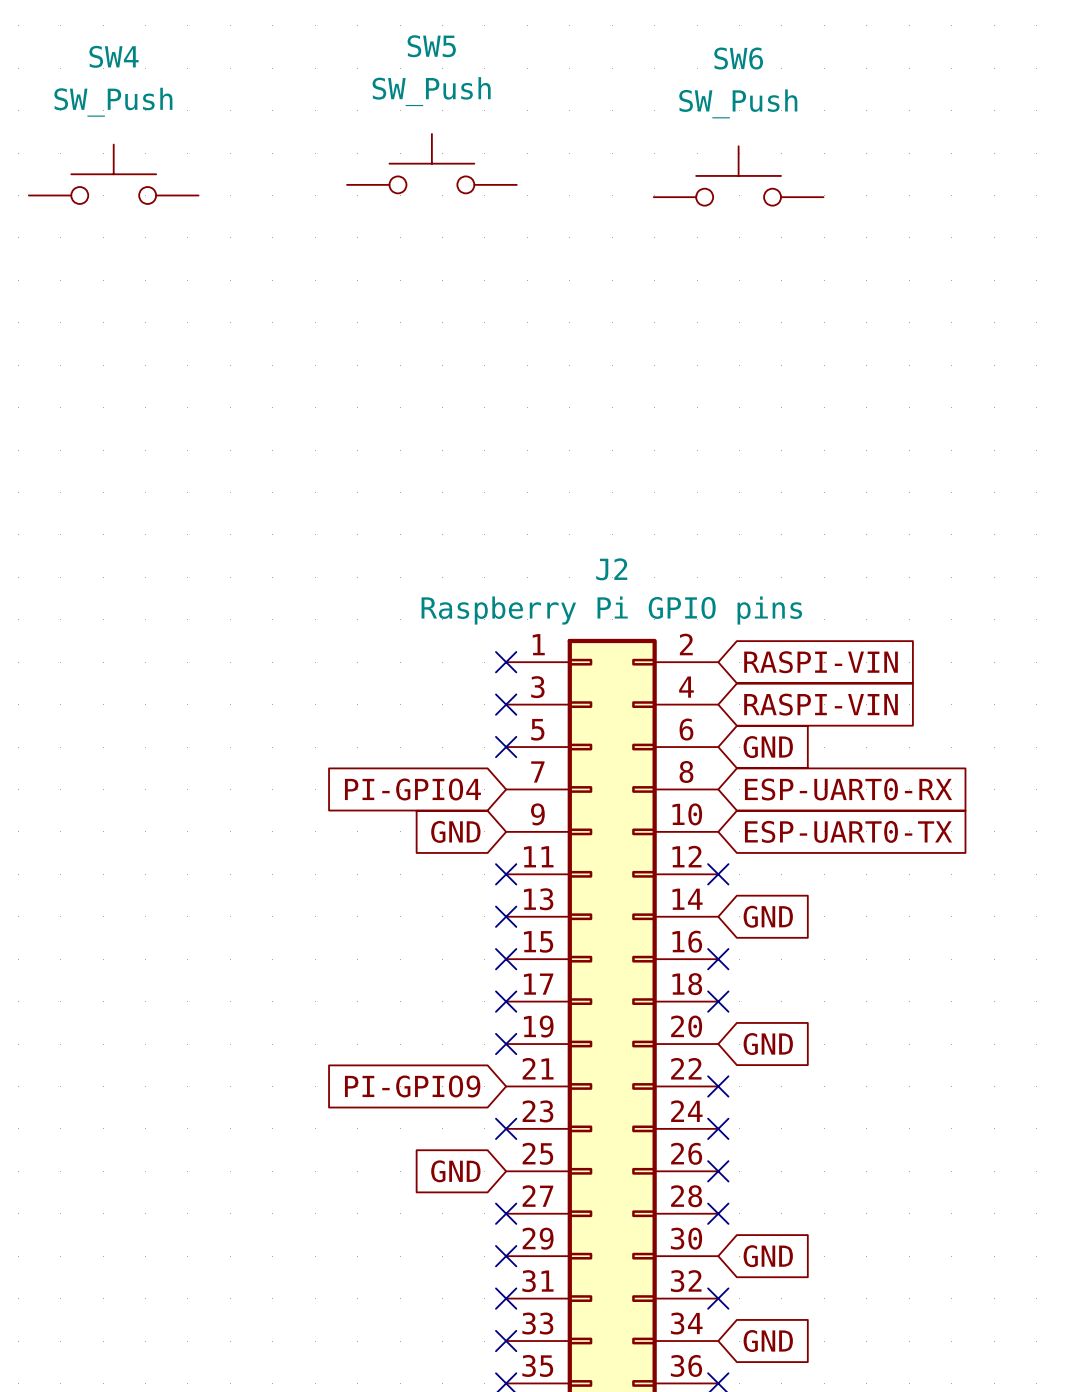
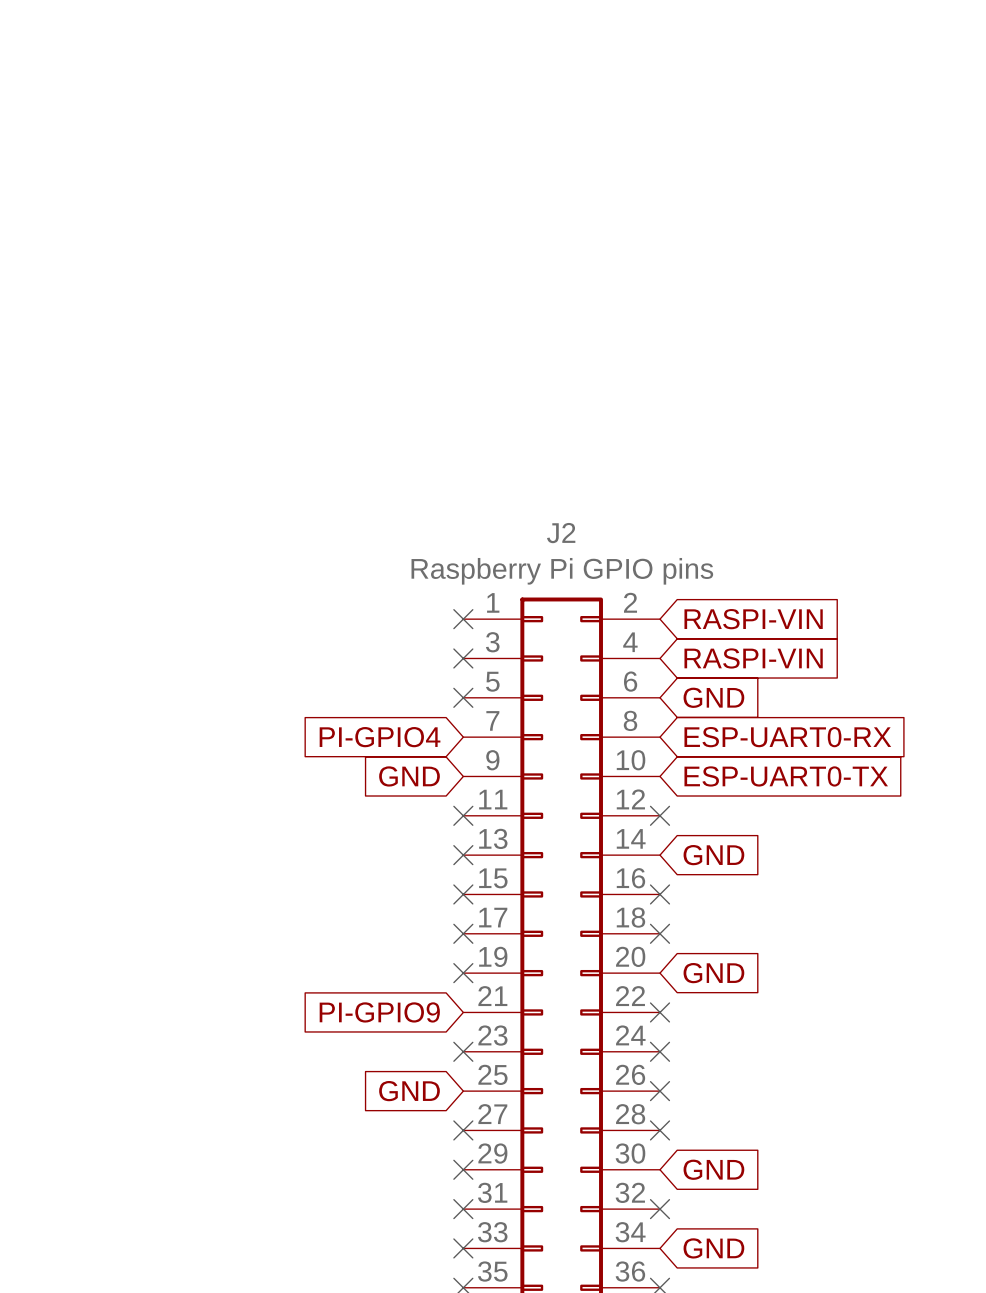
SW5: SW_Push (431, 163) -> none
SW4: SW_Push (113, 174) -> none
SW6: SW_Push (738, 175) -> none

